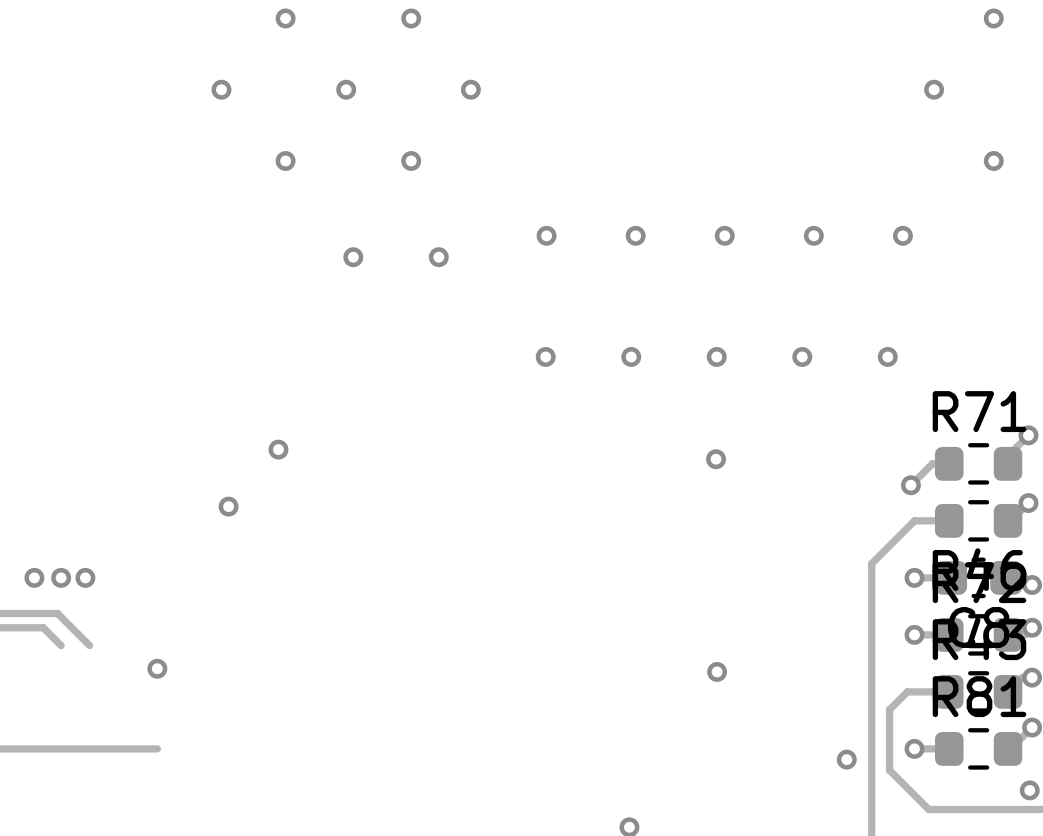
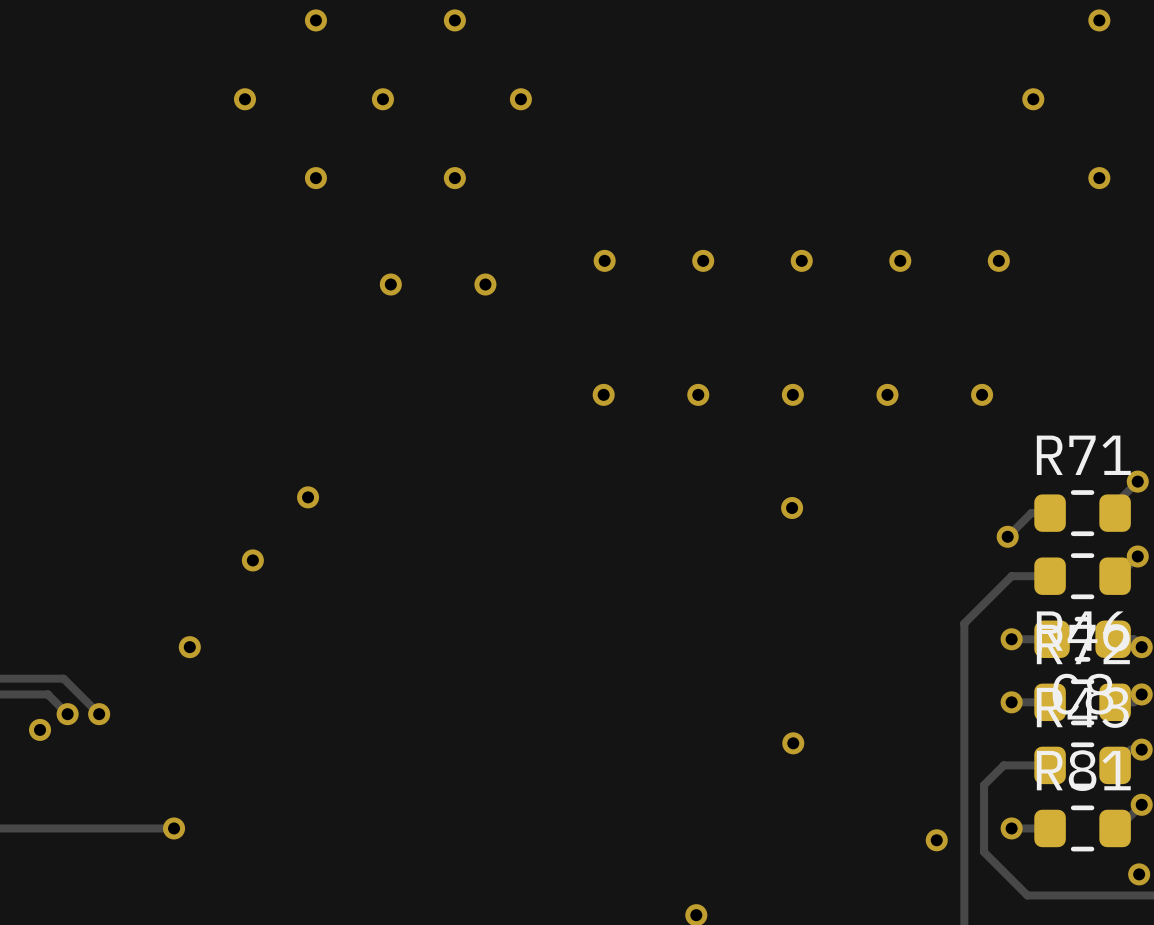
via: (34, 577) -> none
via: (61, 577) -> none
via: (85, 577) -> none
via: none -> (189, 647)
via: none -> (67, 714)
via: none -> (99, 714)
via: none -> (40, 729)
via: (157, 668) -> none
via: none -> (174, 828)

